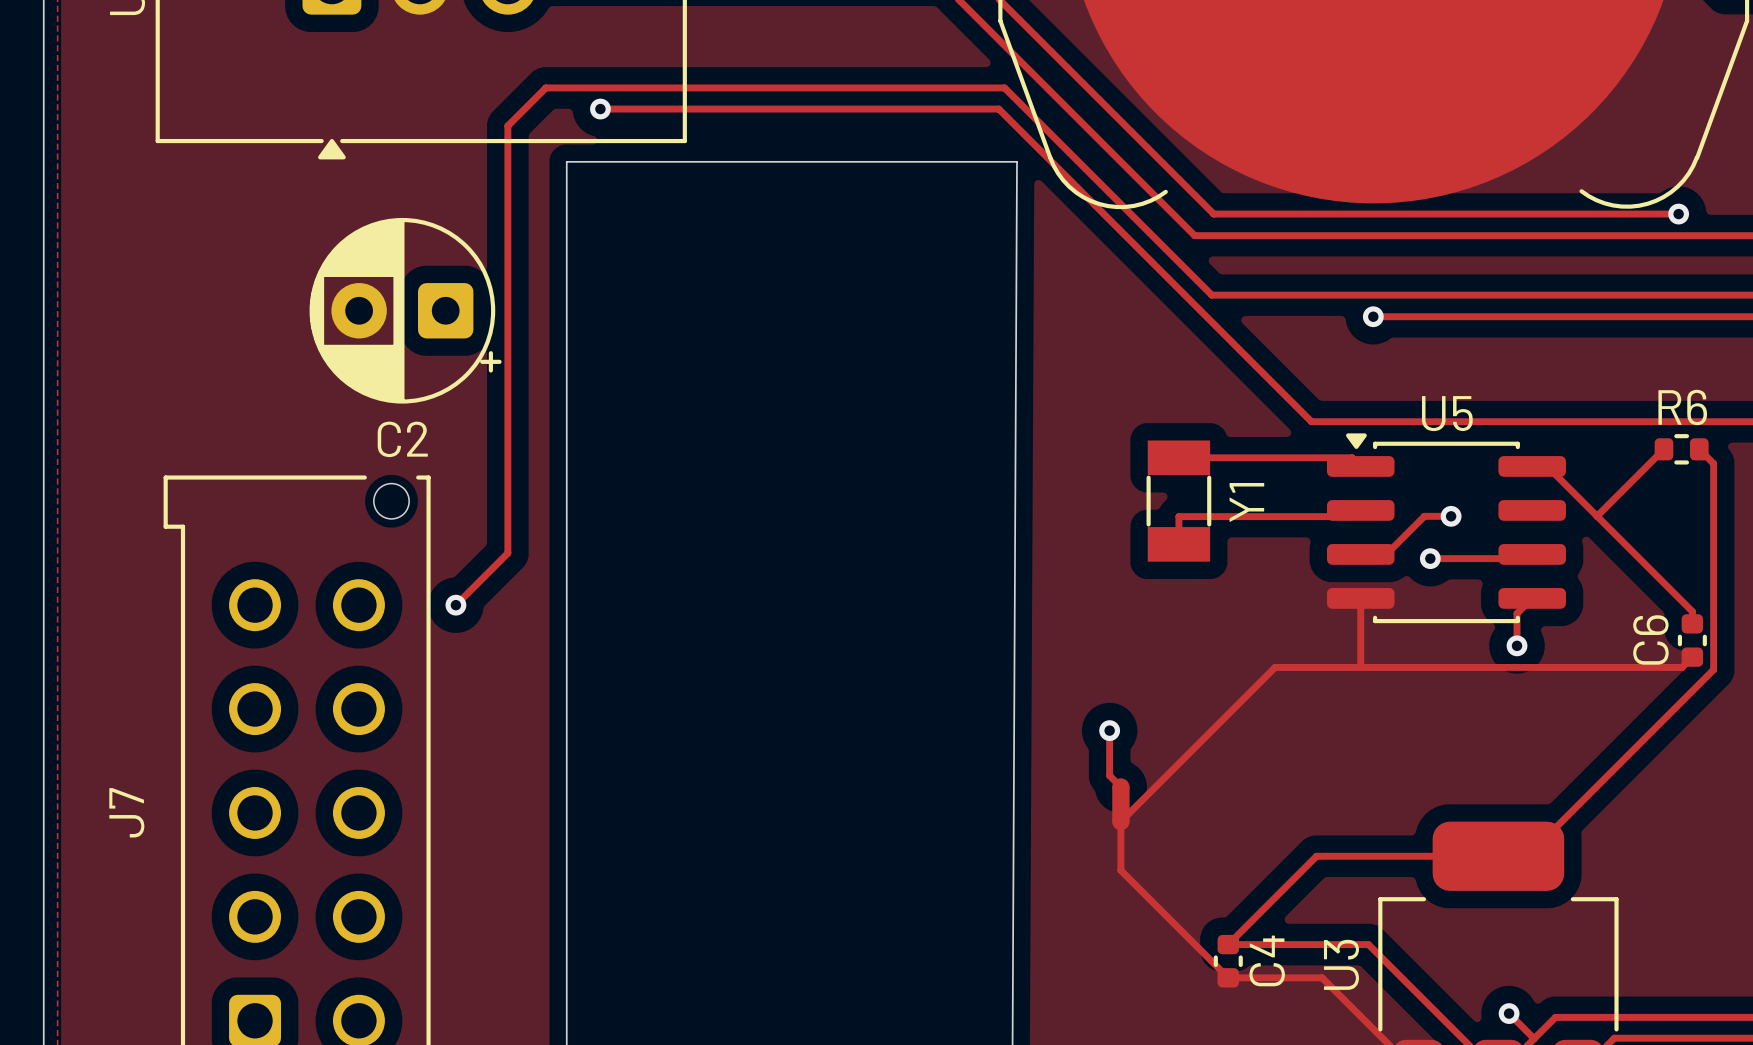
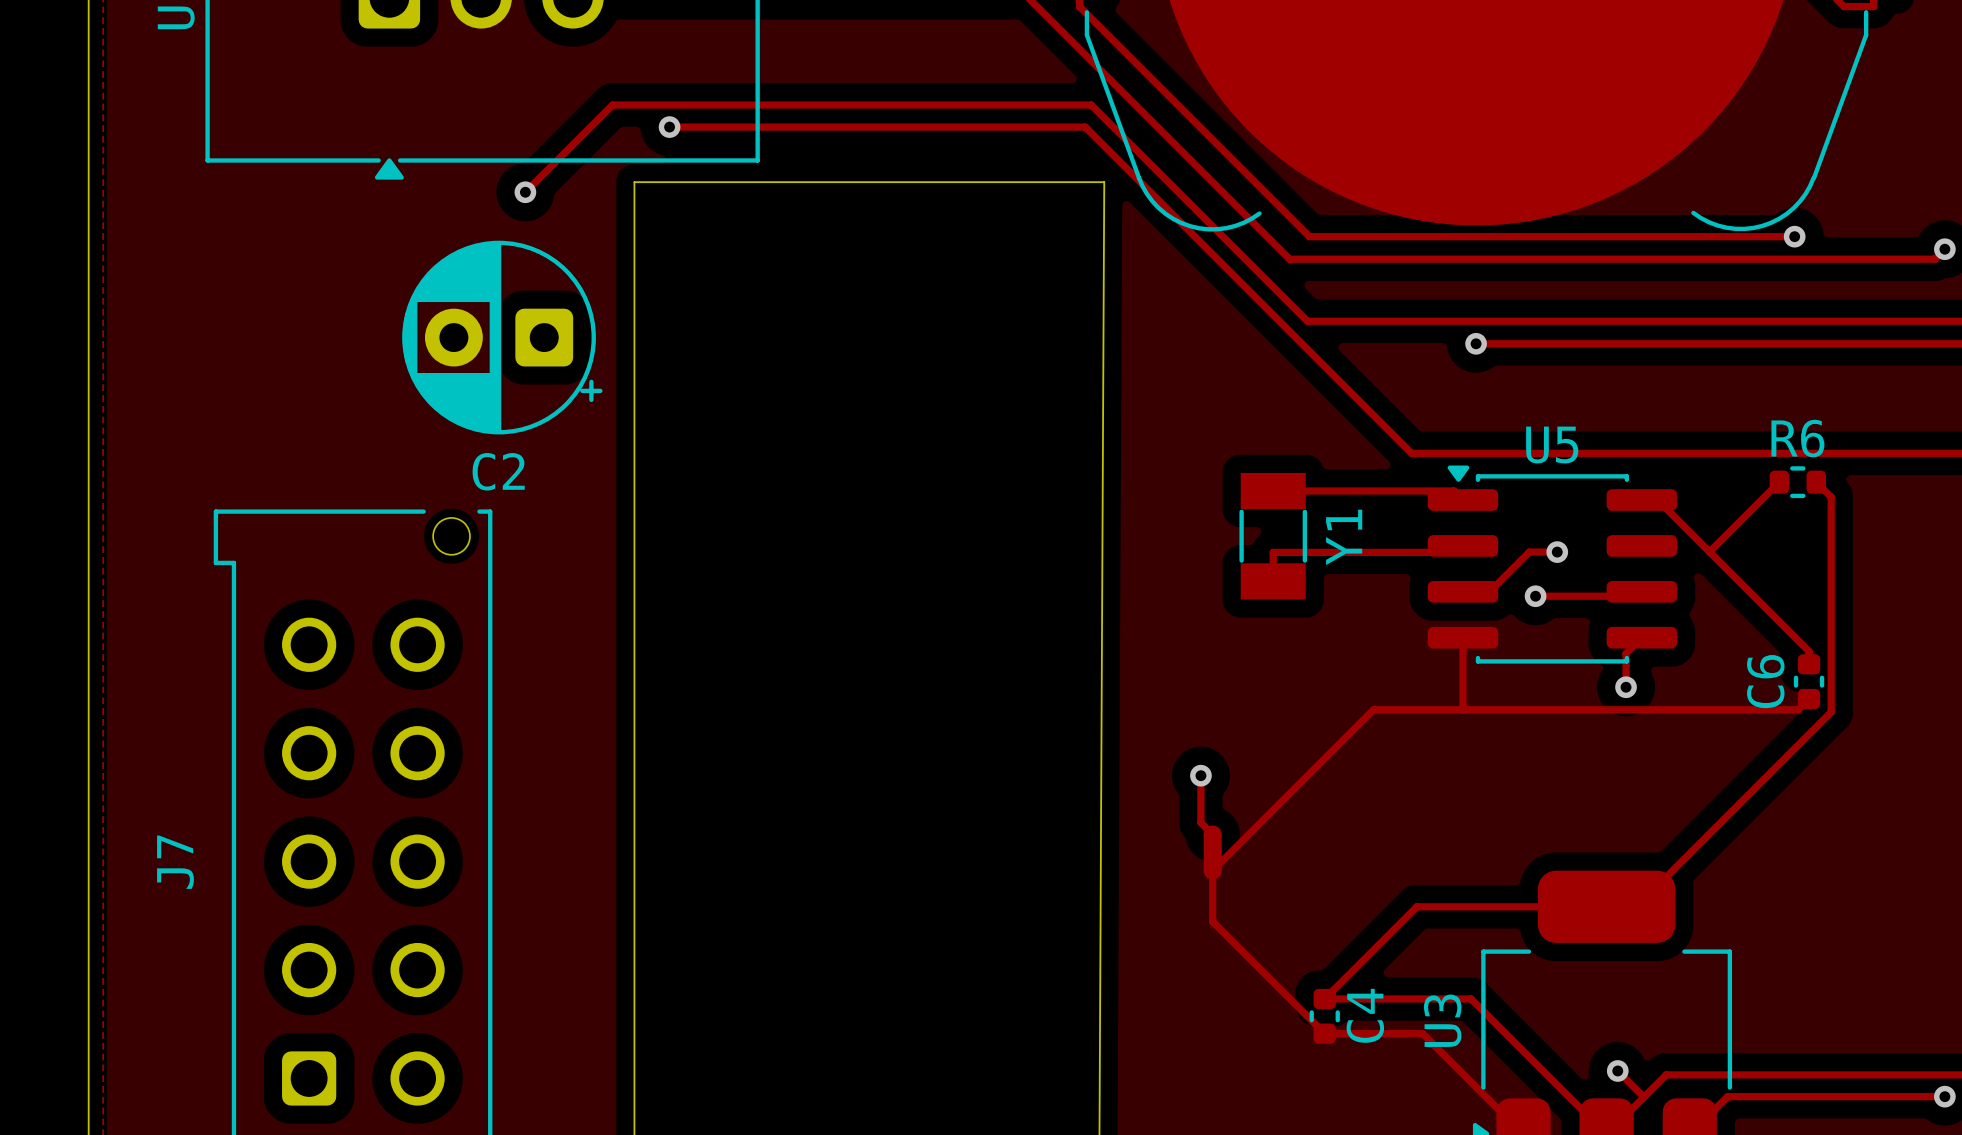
track: (507, 125) (507, 553) (455, 605) -> (572, 144) (525, 192)
via: none -> (525, 192)
C2 position: (405, 310) -> (502, 337)
via: (455, 605) -> none

